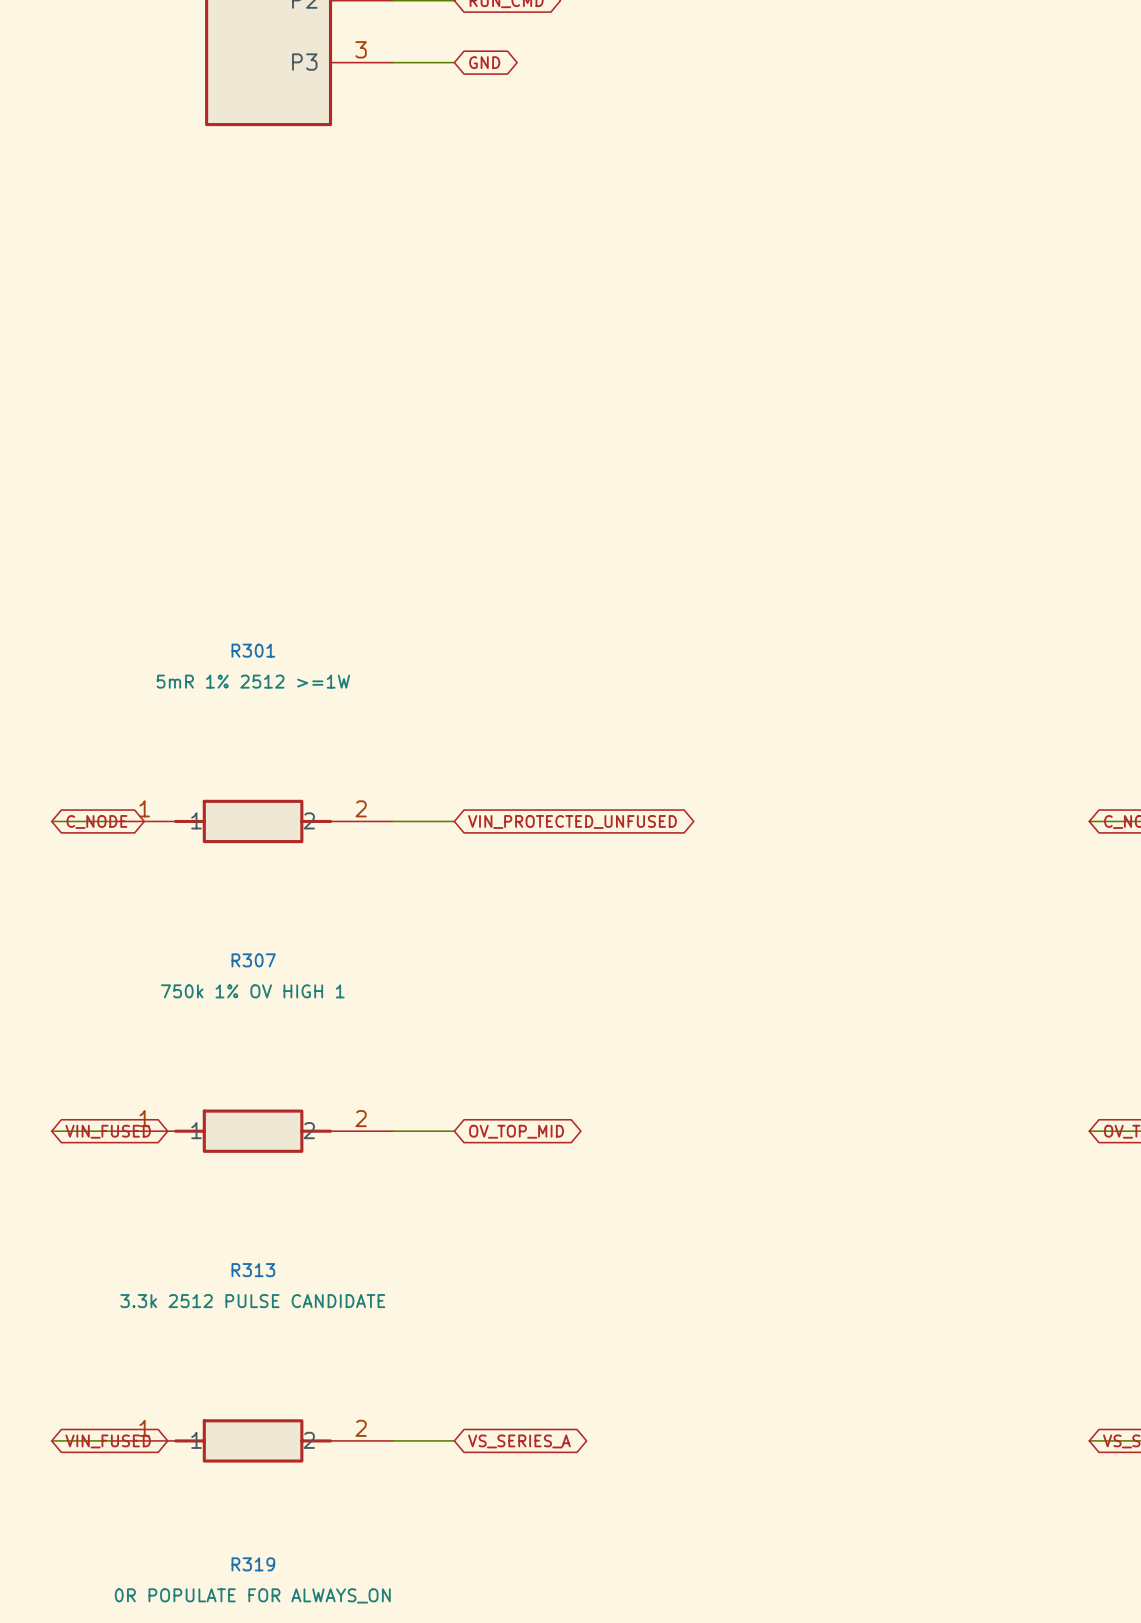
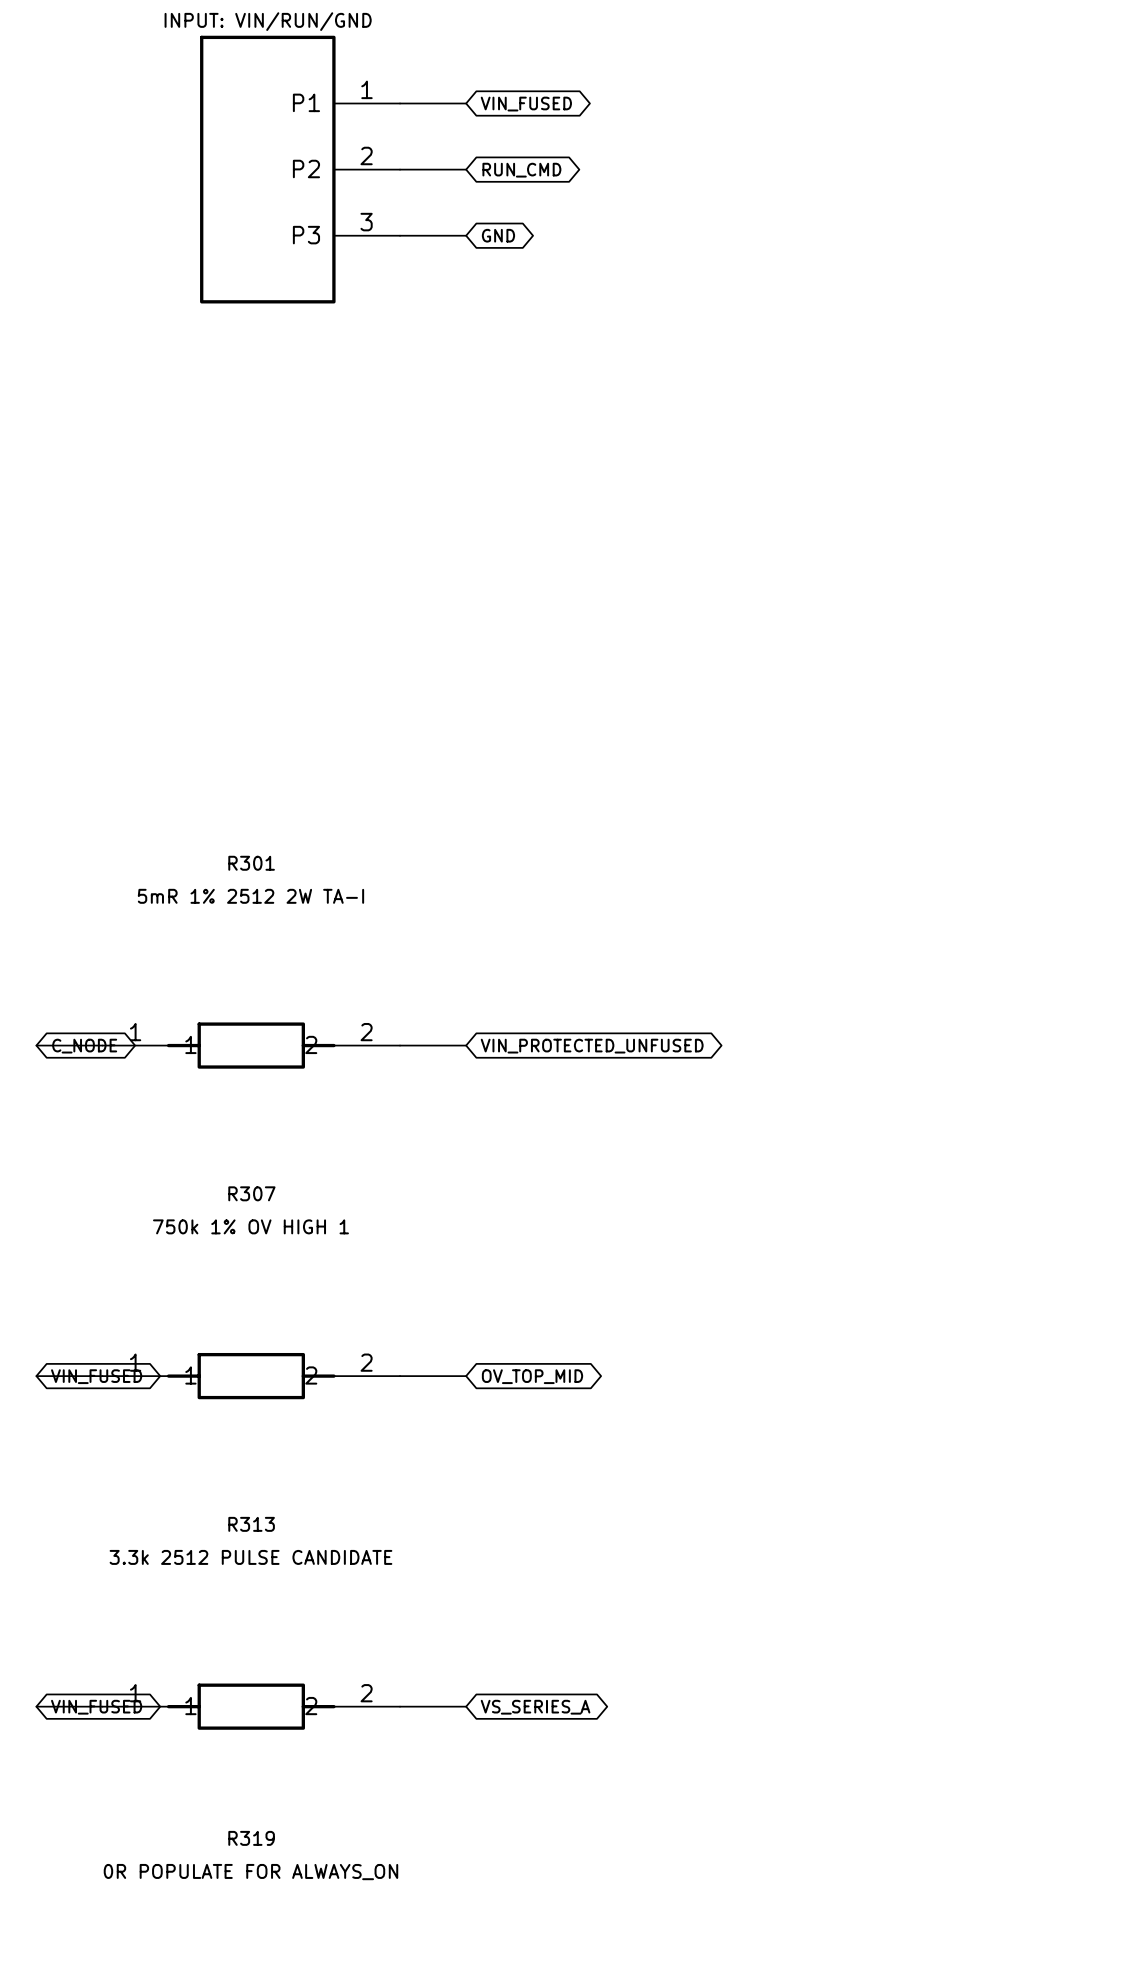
R301 value: 5mR 1% 2512 >=1W (253, 681) -> 5mR 1% 2512 2W TA-I (250, 896)

